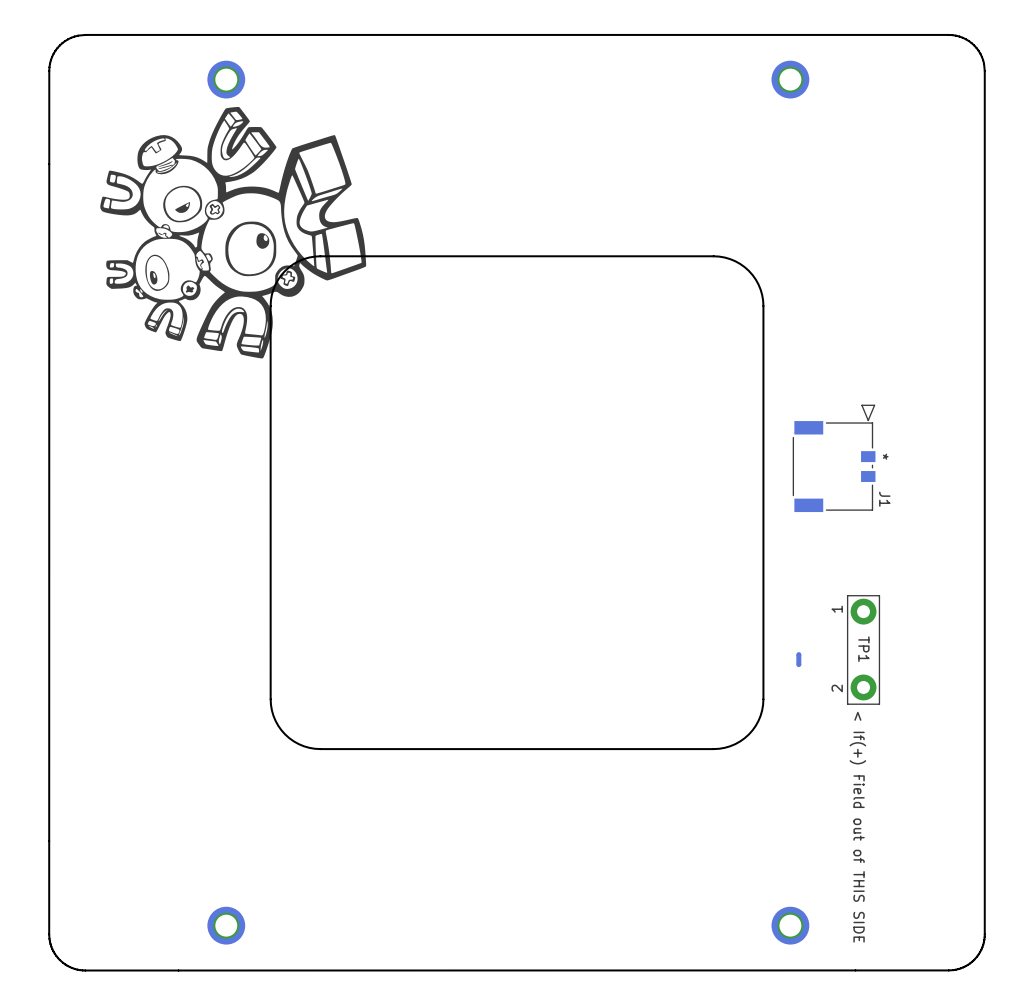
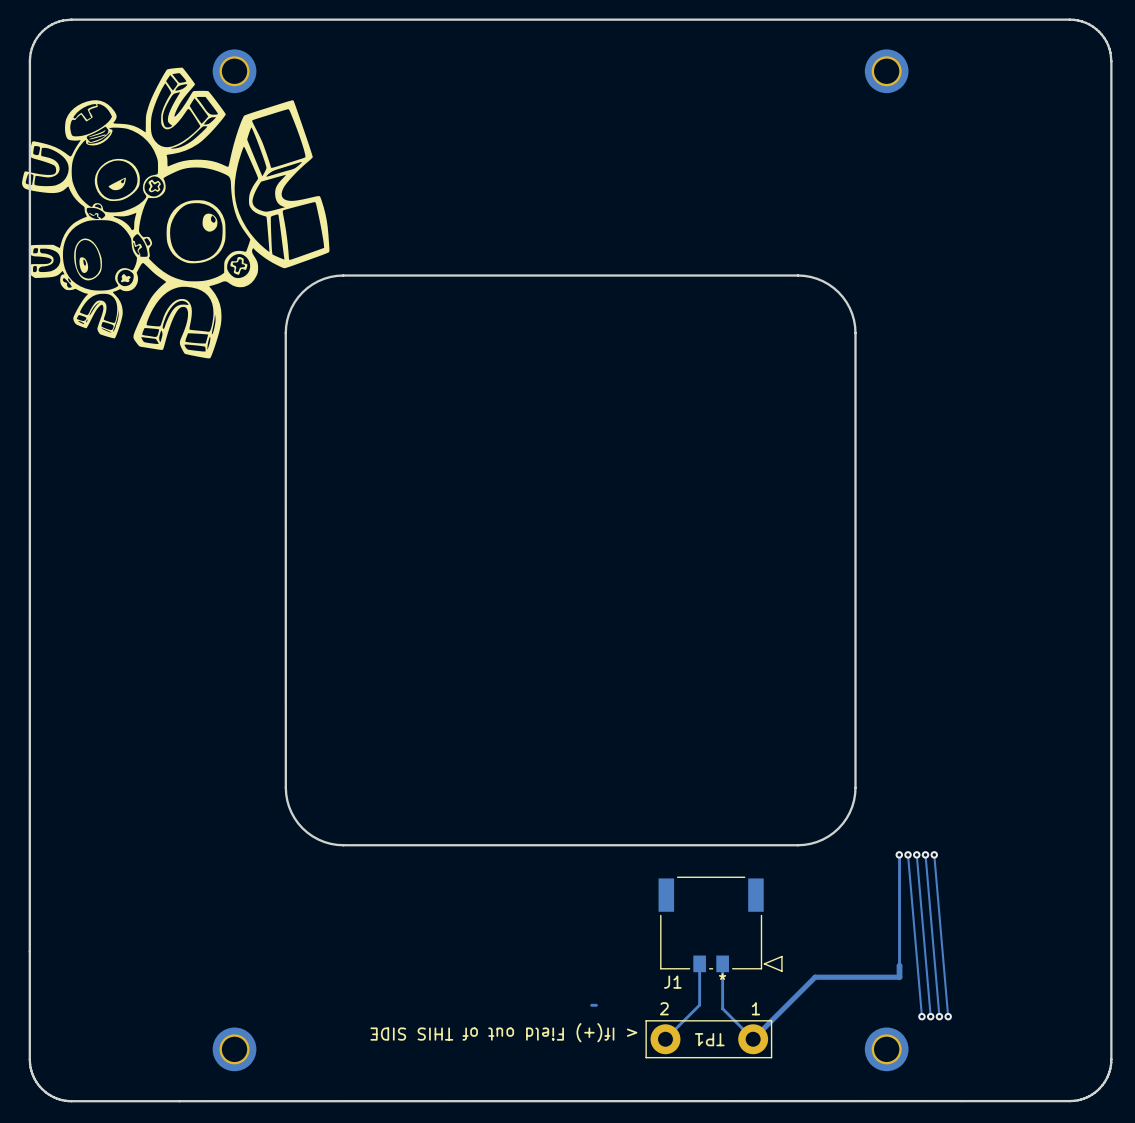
drawing position: (233, 232) -> (175, 213)
J1 rotation: 0° (834, 458) -> 90° clockwise (720, 924)
J1 position: (834, 458) -> (720, 924)
text: 1 (837, 609) -> none
TP1 rotation: 0° (863, 649) -> 90° clockwise (708, 1039)
TP1 position: (863, 649) -> (708, 1039)
part position: (798, 659) -> (899, 971)
text: 2 (837, 688) -> none
track: none -> (899, 854) (899, 965)
via: none -> (899, 854)
track: none -> (908, 854) (921, 1016)
via: none -> (908, 854)
track: none -> (916, 854) (930, 1016)
via: none -> (916, 854)
track: none -> (925, 854) (939, 1016)
via: none -> (925, 854)
track: none -> (934, 854) (948, 1016)
via: none -> (934, 854)
text: < If(+) Field out of THIS SIDE (857, 827) -> none
track: none -> (699, 963) (699, 1005) (665, 1039)
track: none -> (722, 963) (722, 1008) (753, 1039) (815, 977) (899, 977)
track: none -> (596, 1005) (591, 1005)
text: none -> 2 (664, 1008)
text: none -> 1 (755, 1008)
via: none -> (921, 1016)
via: none -> (930, 1016)
via: none -> (939, 1016)
via: none -> (948, 1016)
text: none -> < If(+) Field out of THIS SIDE (503, 1032)

